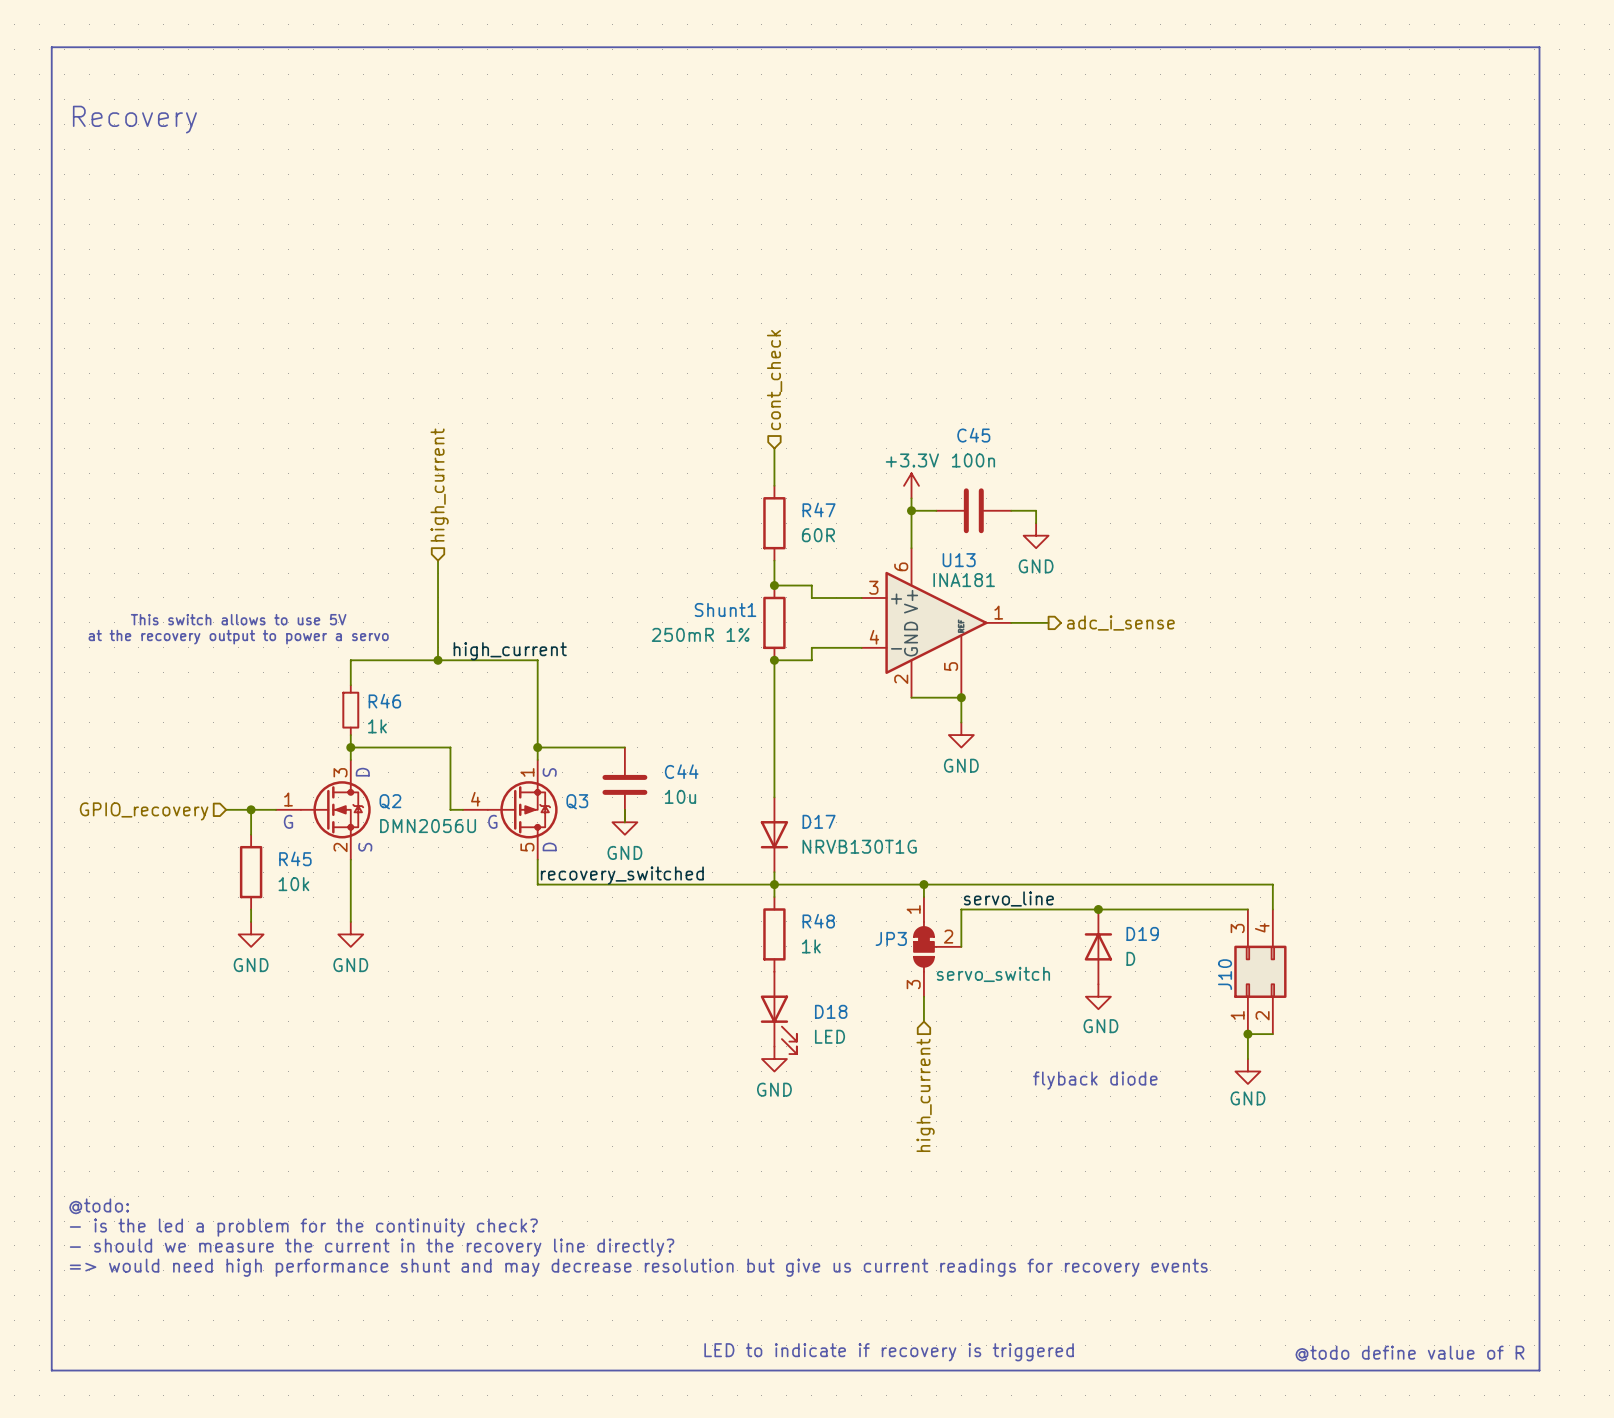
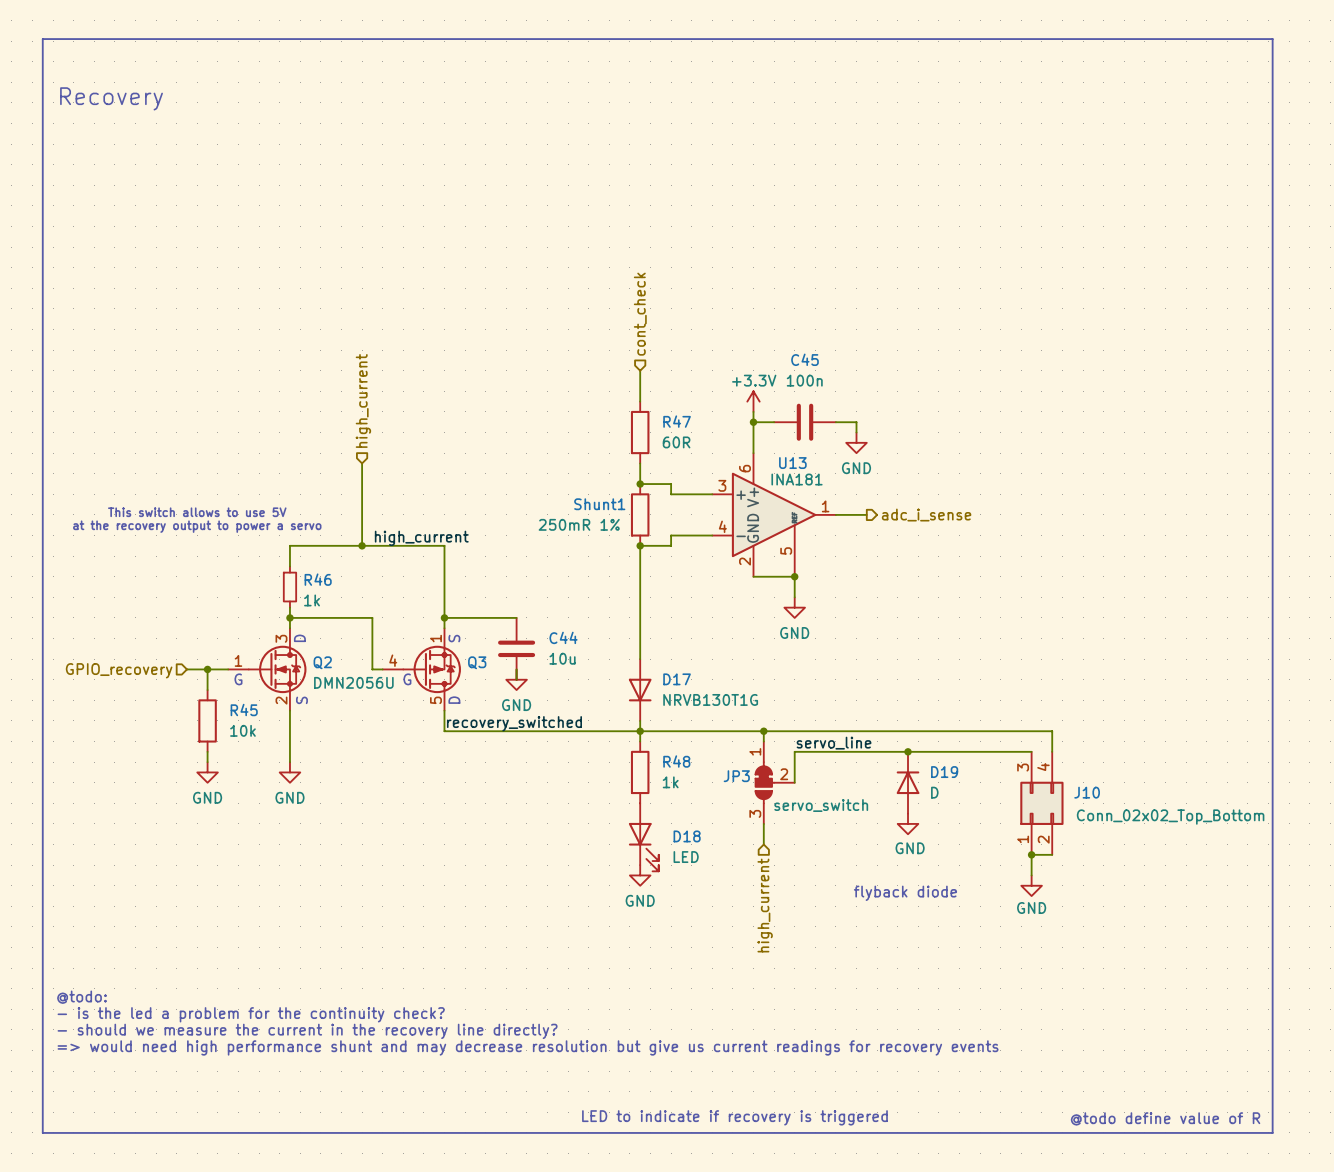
J10 name rotation: 0° (1225, 974) -> 90° clockwise (1087, 792)
J10 name position: J10 (1225, 974) -> J10 (1087, 792)
J10 value: none -> Conn_02x02_Top_Bottom (1170, 817)

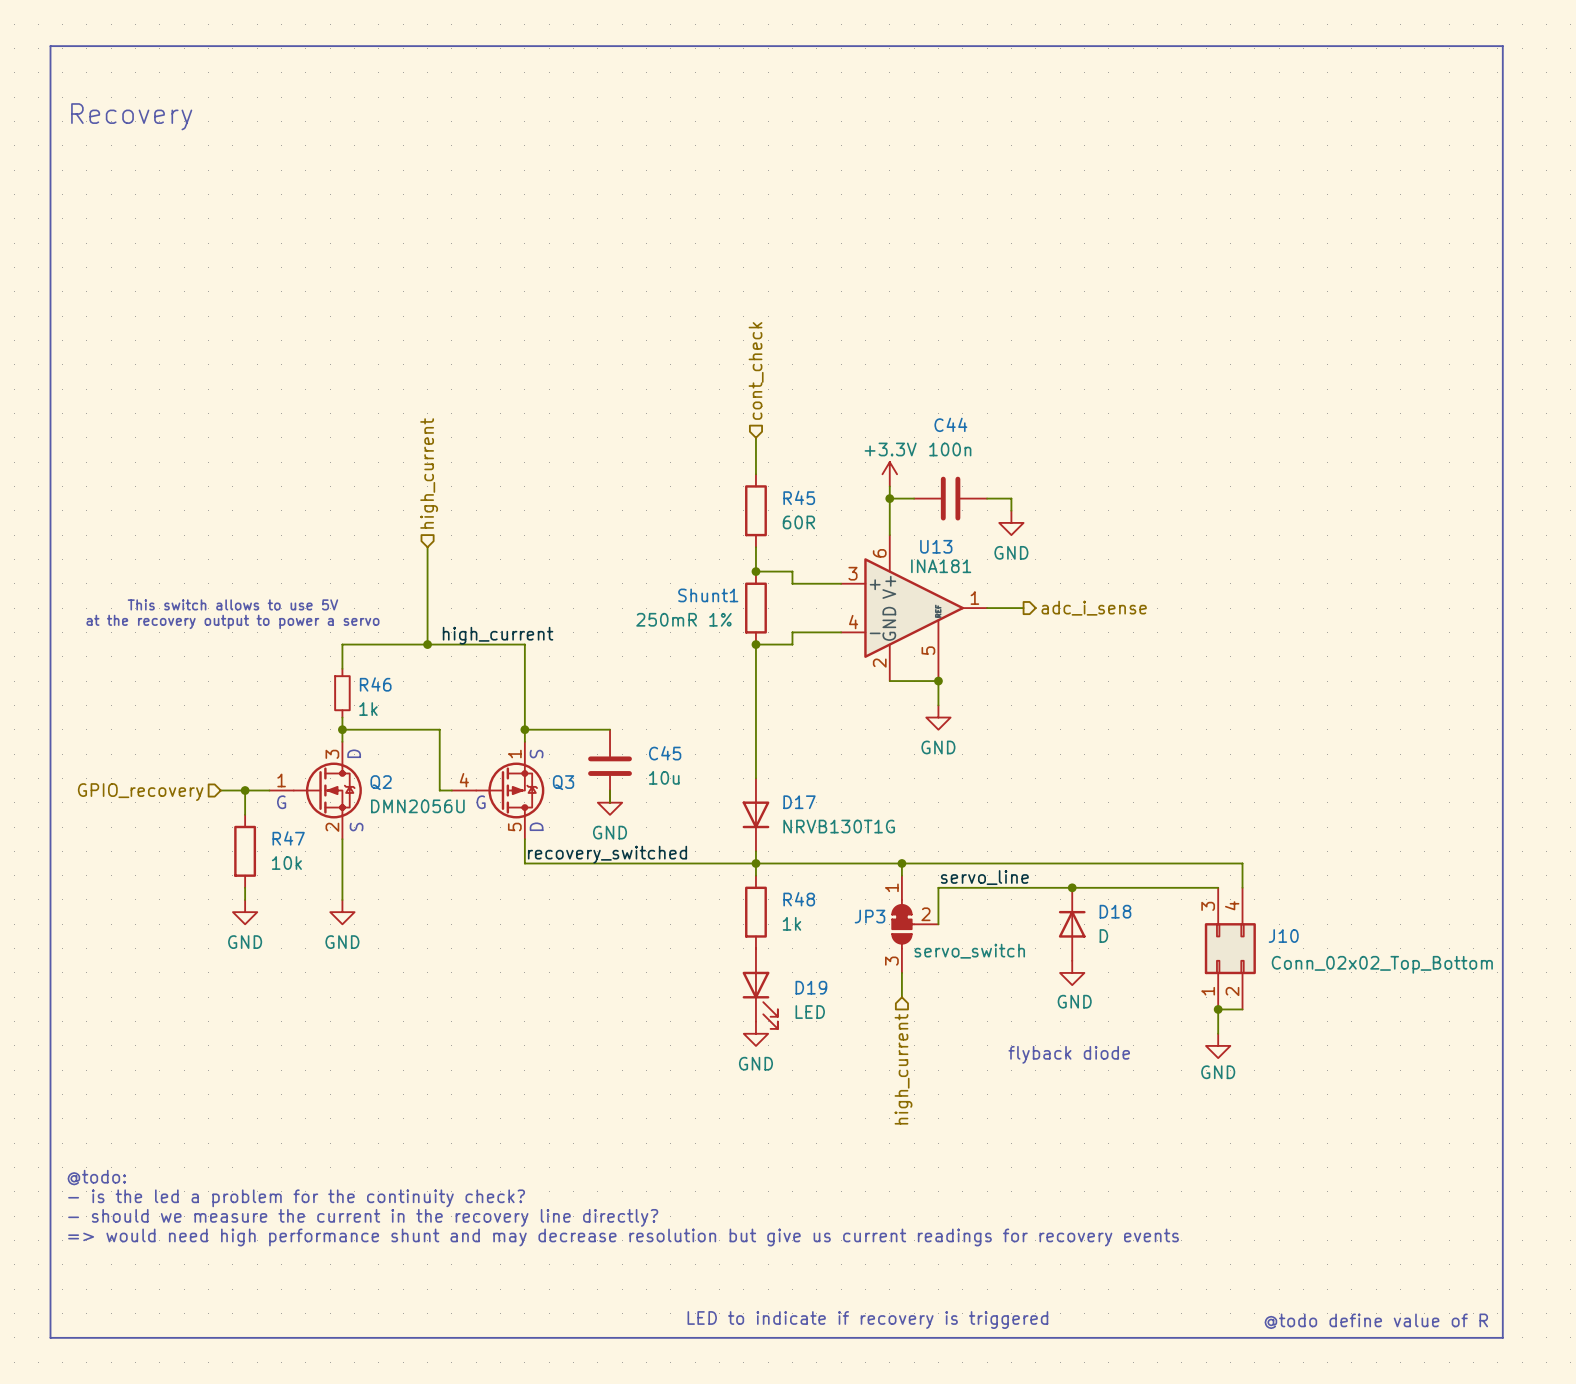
C45 name: C45 (805, 359) -> C44 (950, 424)
R47 name: R47 (677, 421) -> R45 (799, 497)
C44 name: C44 (563, 637) -> C45 (665, 753)
R45 name: R45 (244, 710) -> R47 (288, 838)
D19 name: D19 (944, 772) -> D18 (1115, 911)
D18 name: D18 (687, 836) -> D19 (811, 987)

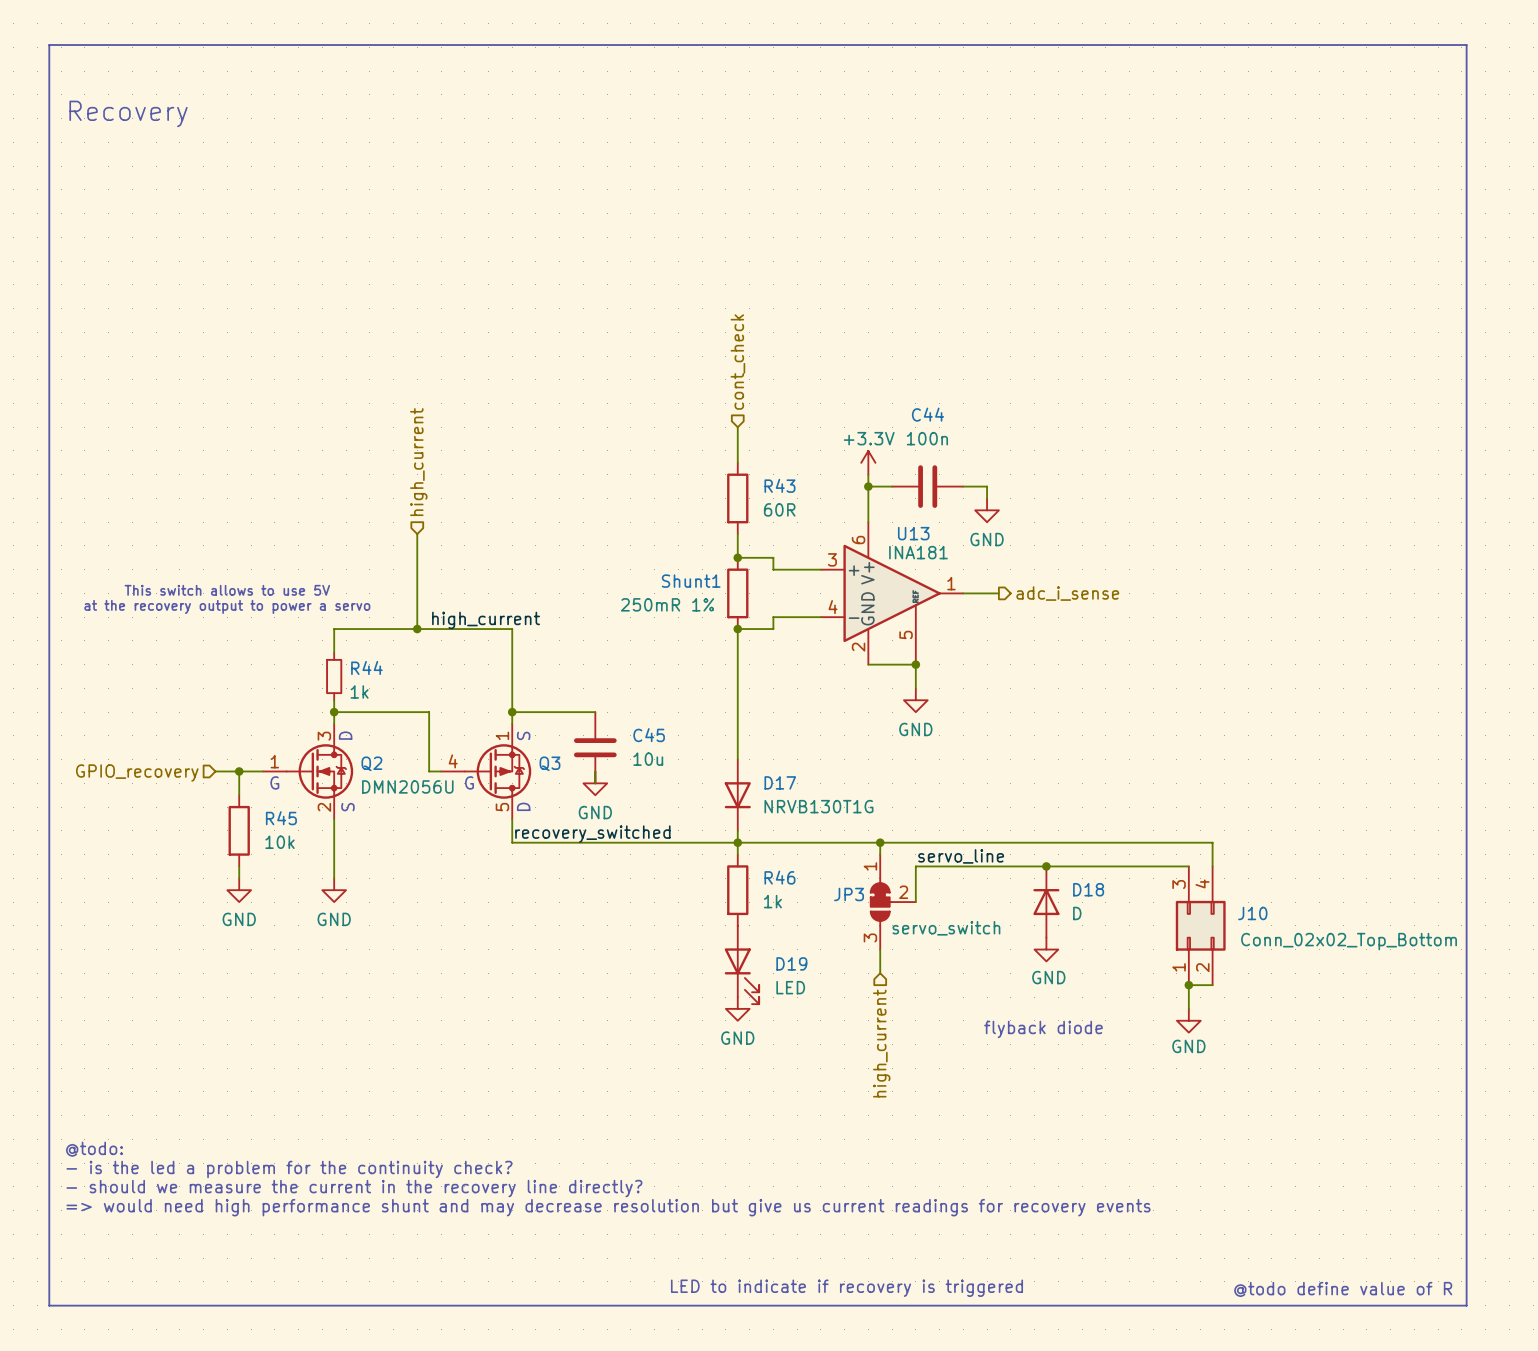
R45 name: R45 (799, 497) -> R43 (779, 485)
R46 name: R46 (375, 684) -> R44 (366, 667)
R47 name: R47 (288, 838) -> R45 (281, 818)
R48 name: R48 (799, 899) -> R46 (779, 877)

